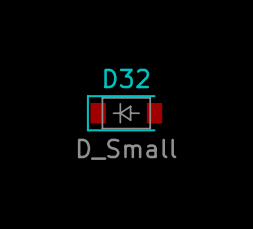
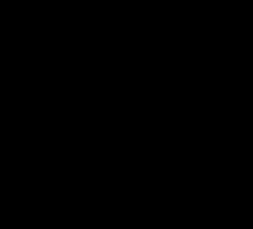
D32: D_Small (124, 113) -> none

